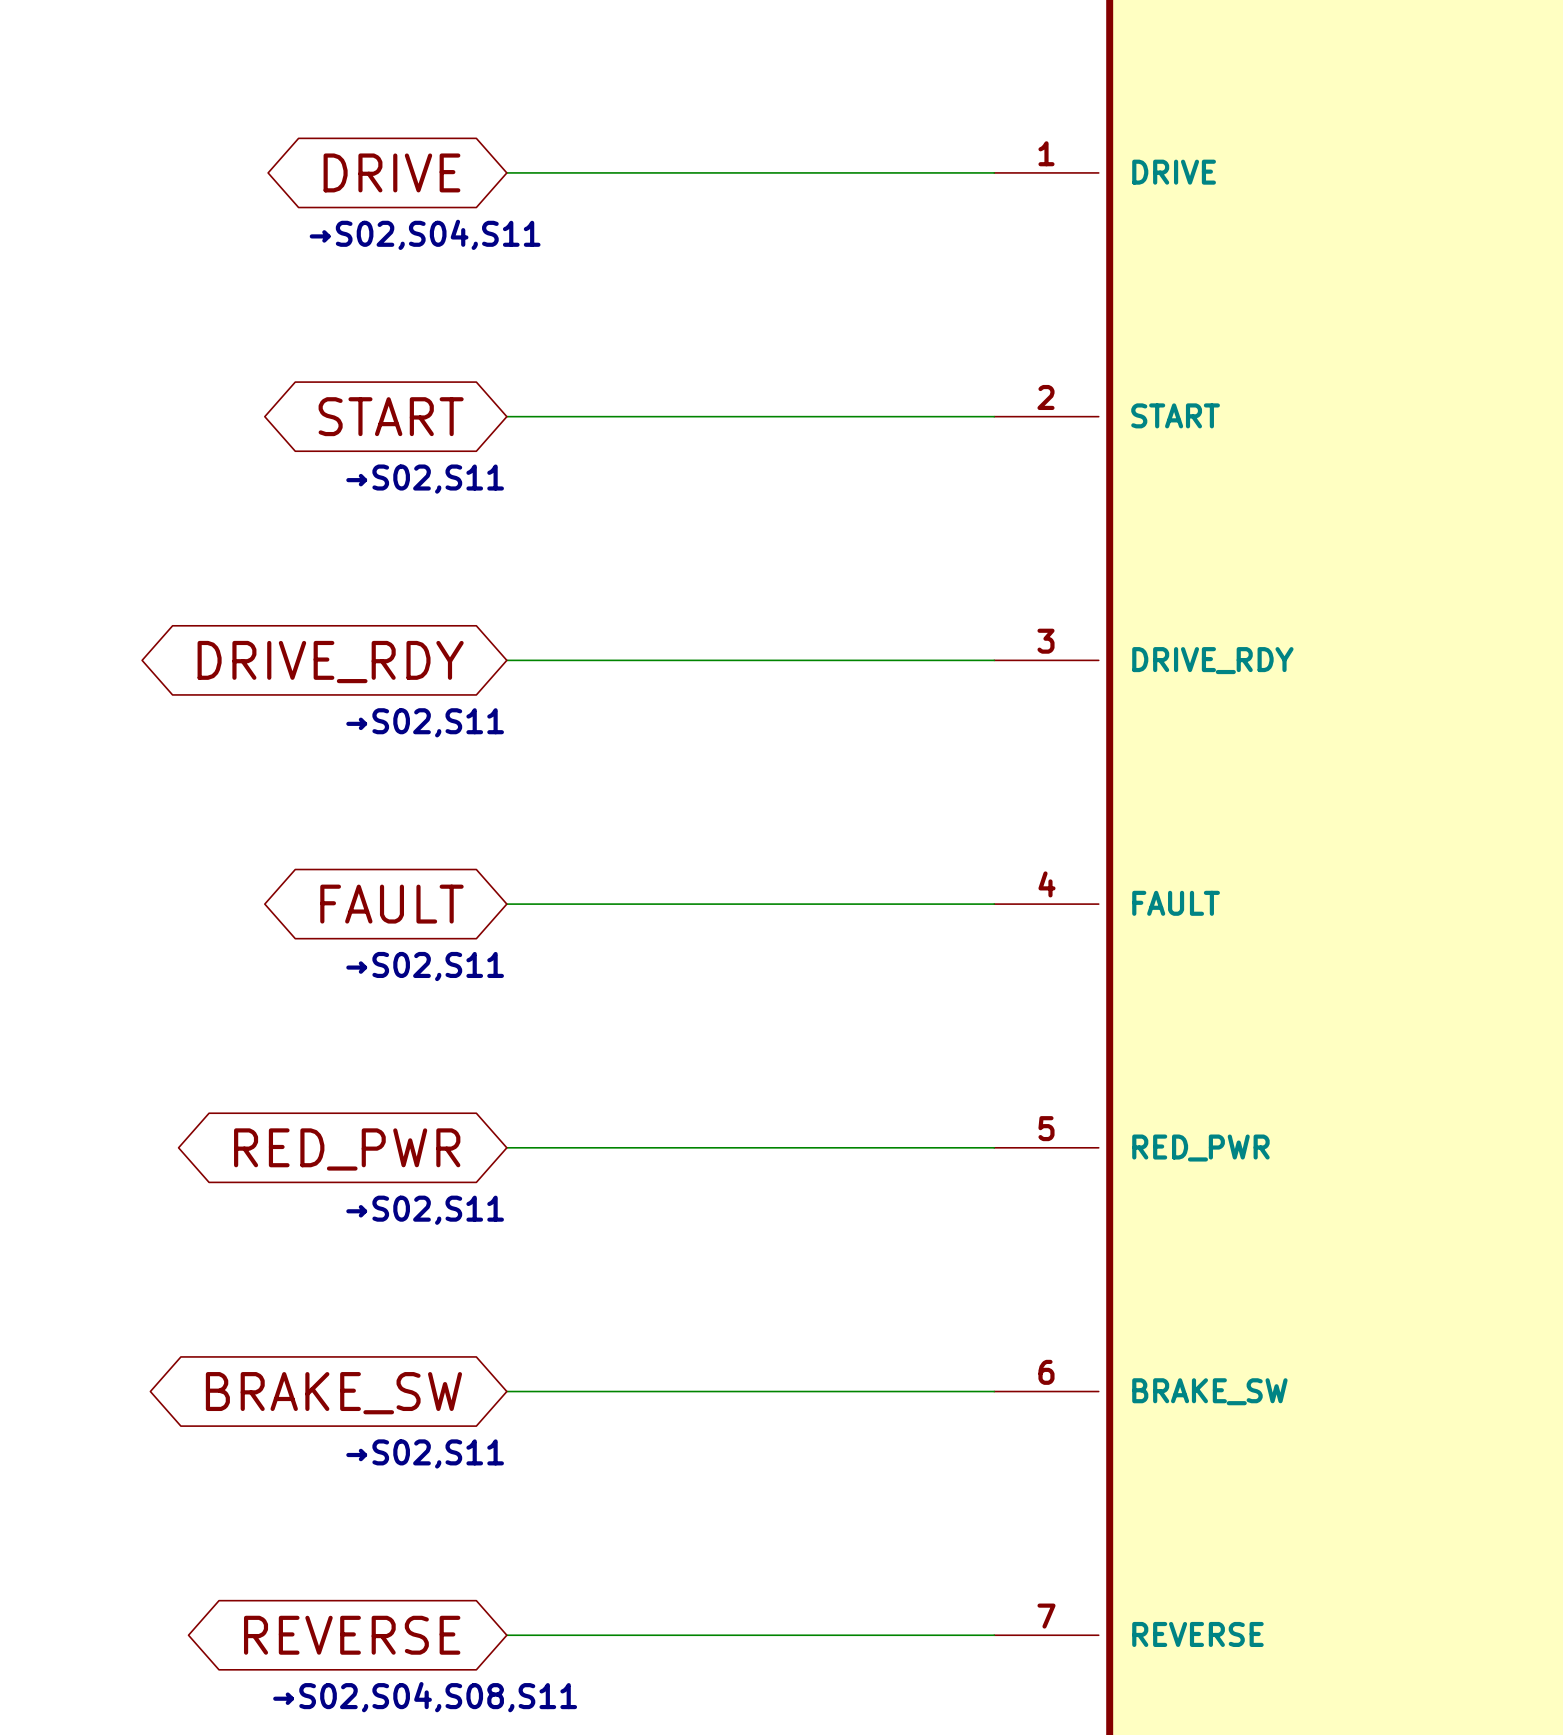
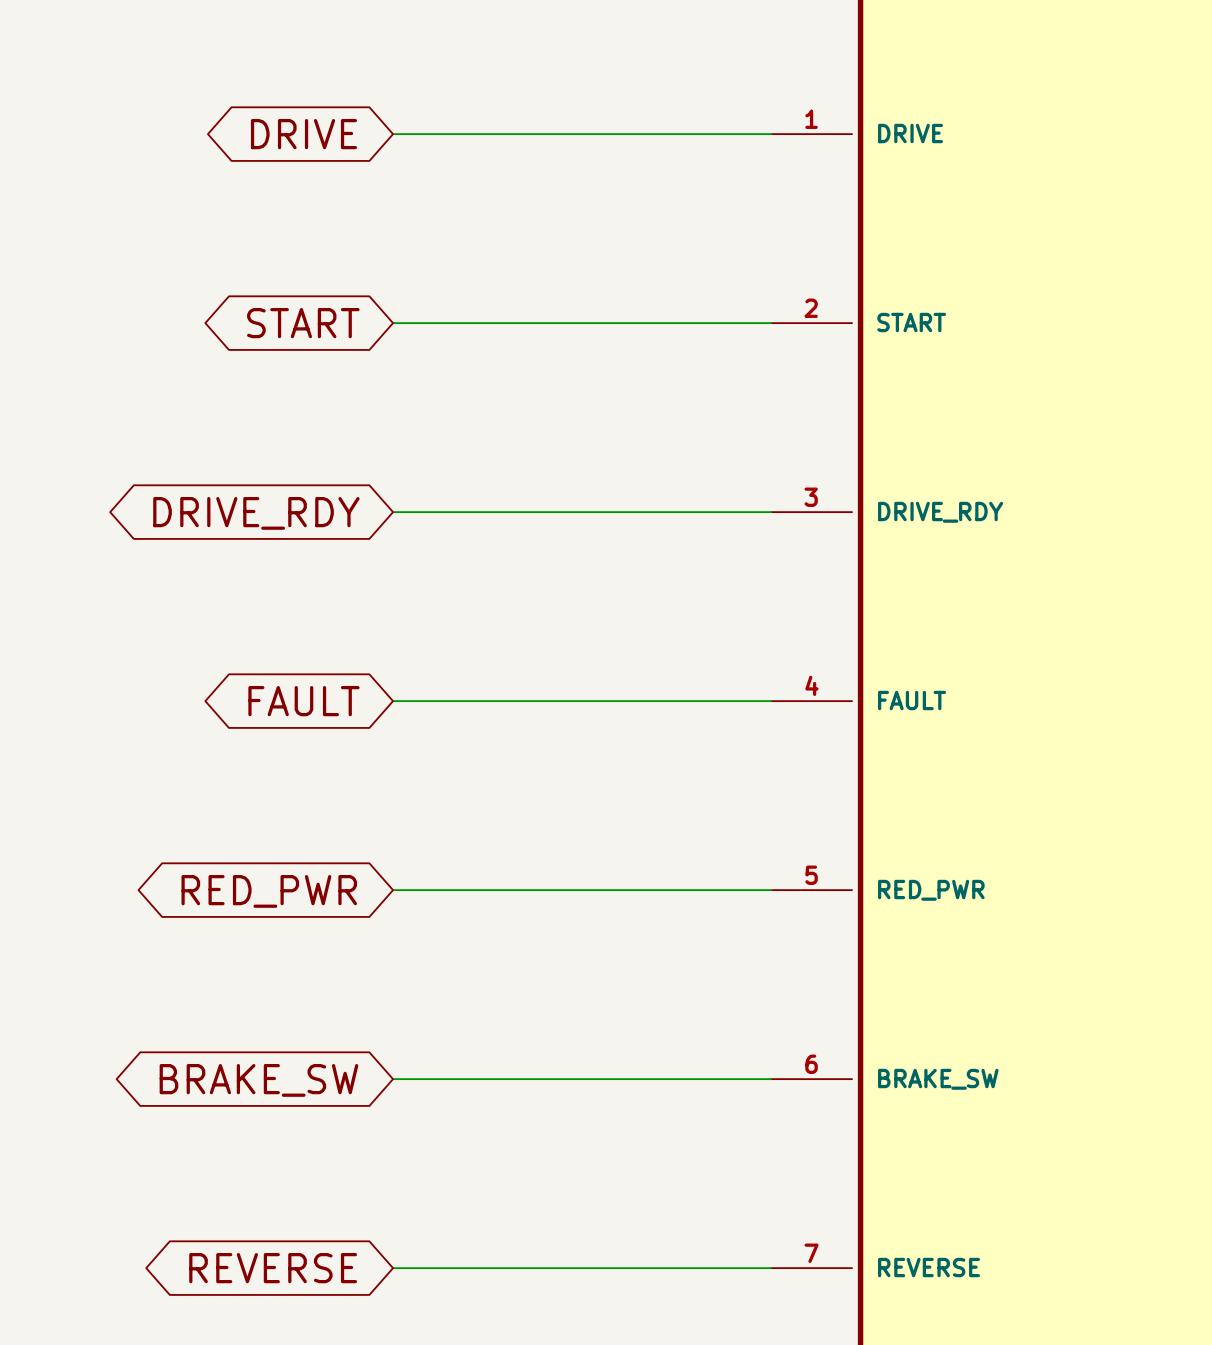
text: →S02,S04,S11 (425, 234) -> none
text: →S02,S11 (425, 479) -> none
text: →S02,S11 (425, 722) -> none
text: →S02,S11 (425, 966) -> none
text: →S02,S11 (425, 1210) -> none
text: →S02,S11 (425, 1453) -> none
text: →S02,S04,S08,S11 (425, 1697) -> none

